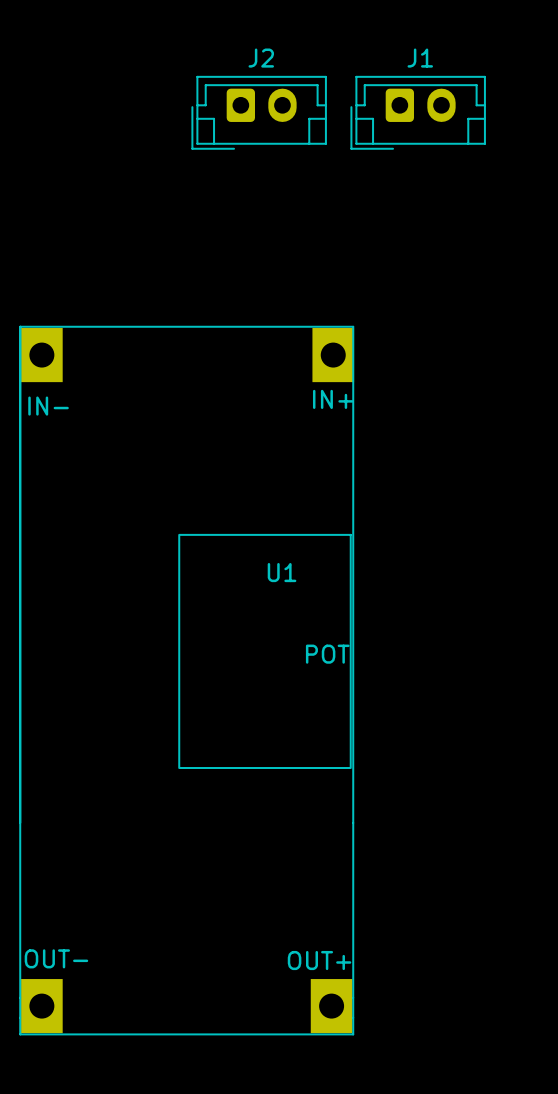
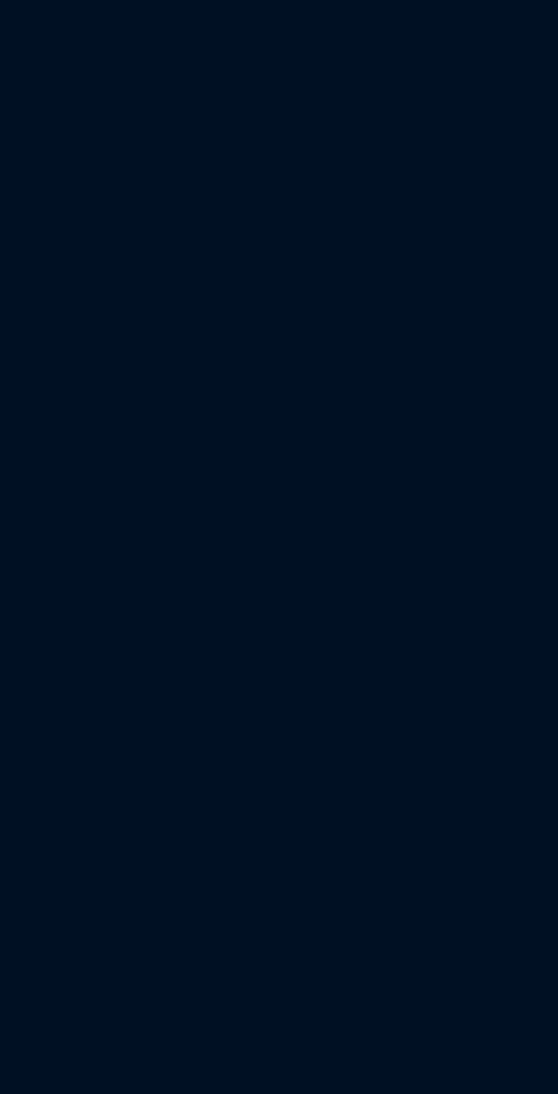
J2: (259, 112) -> none
J1: (418, 112) -> none
U1: (186, 680) -> none

